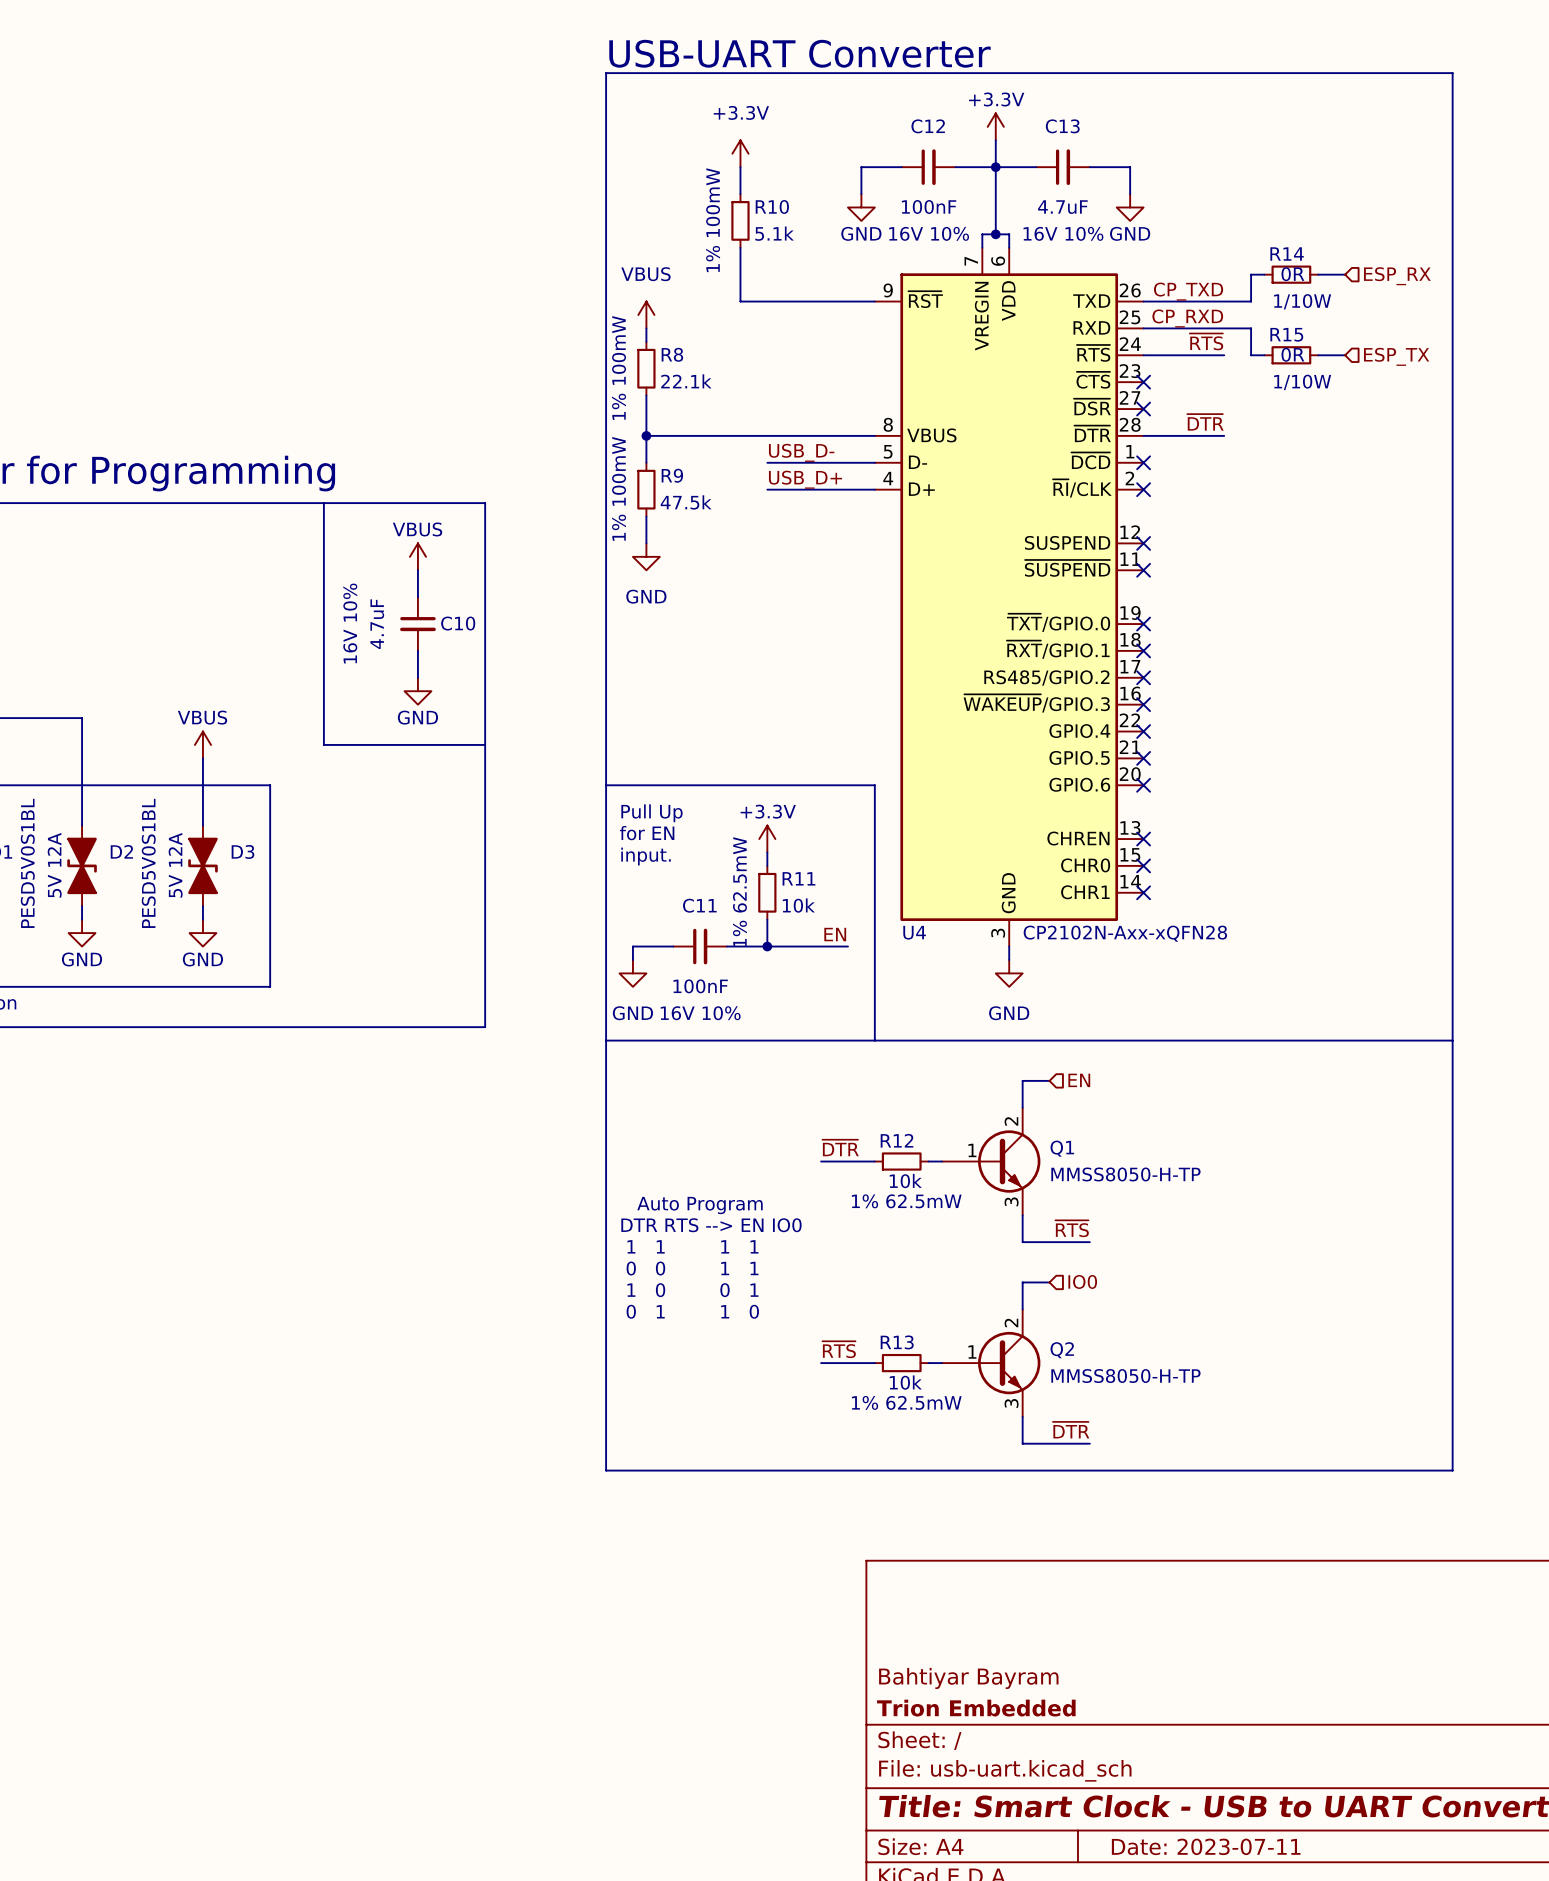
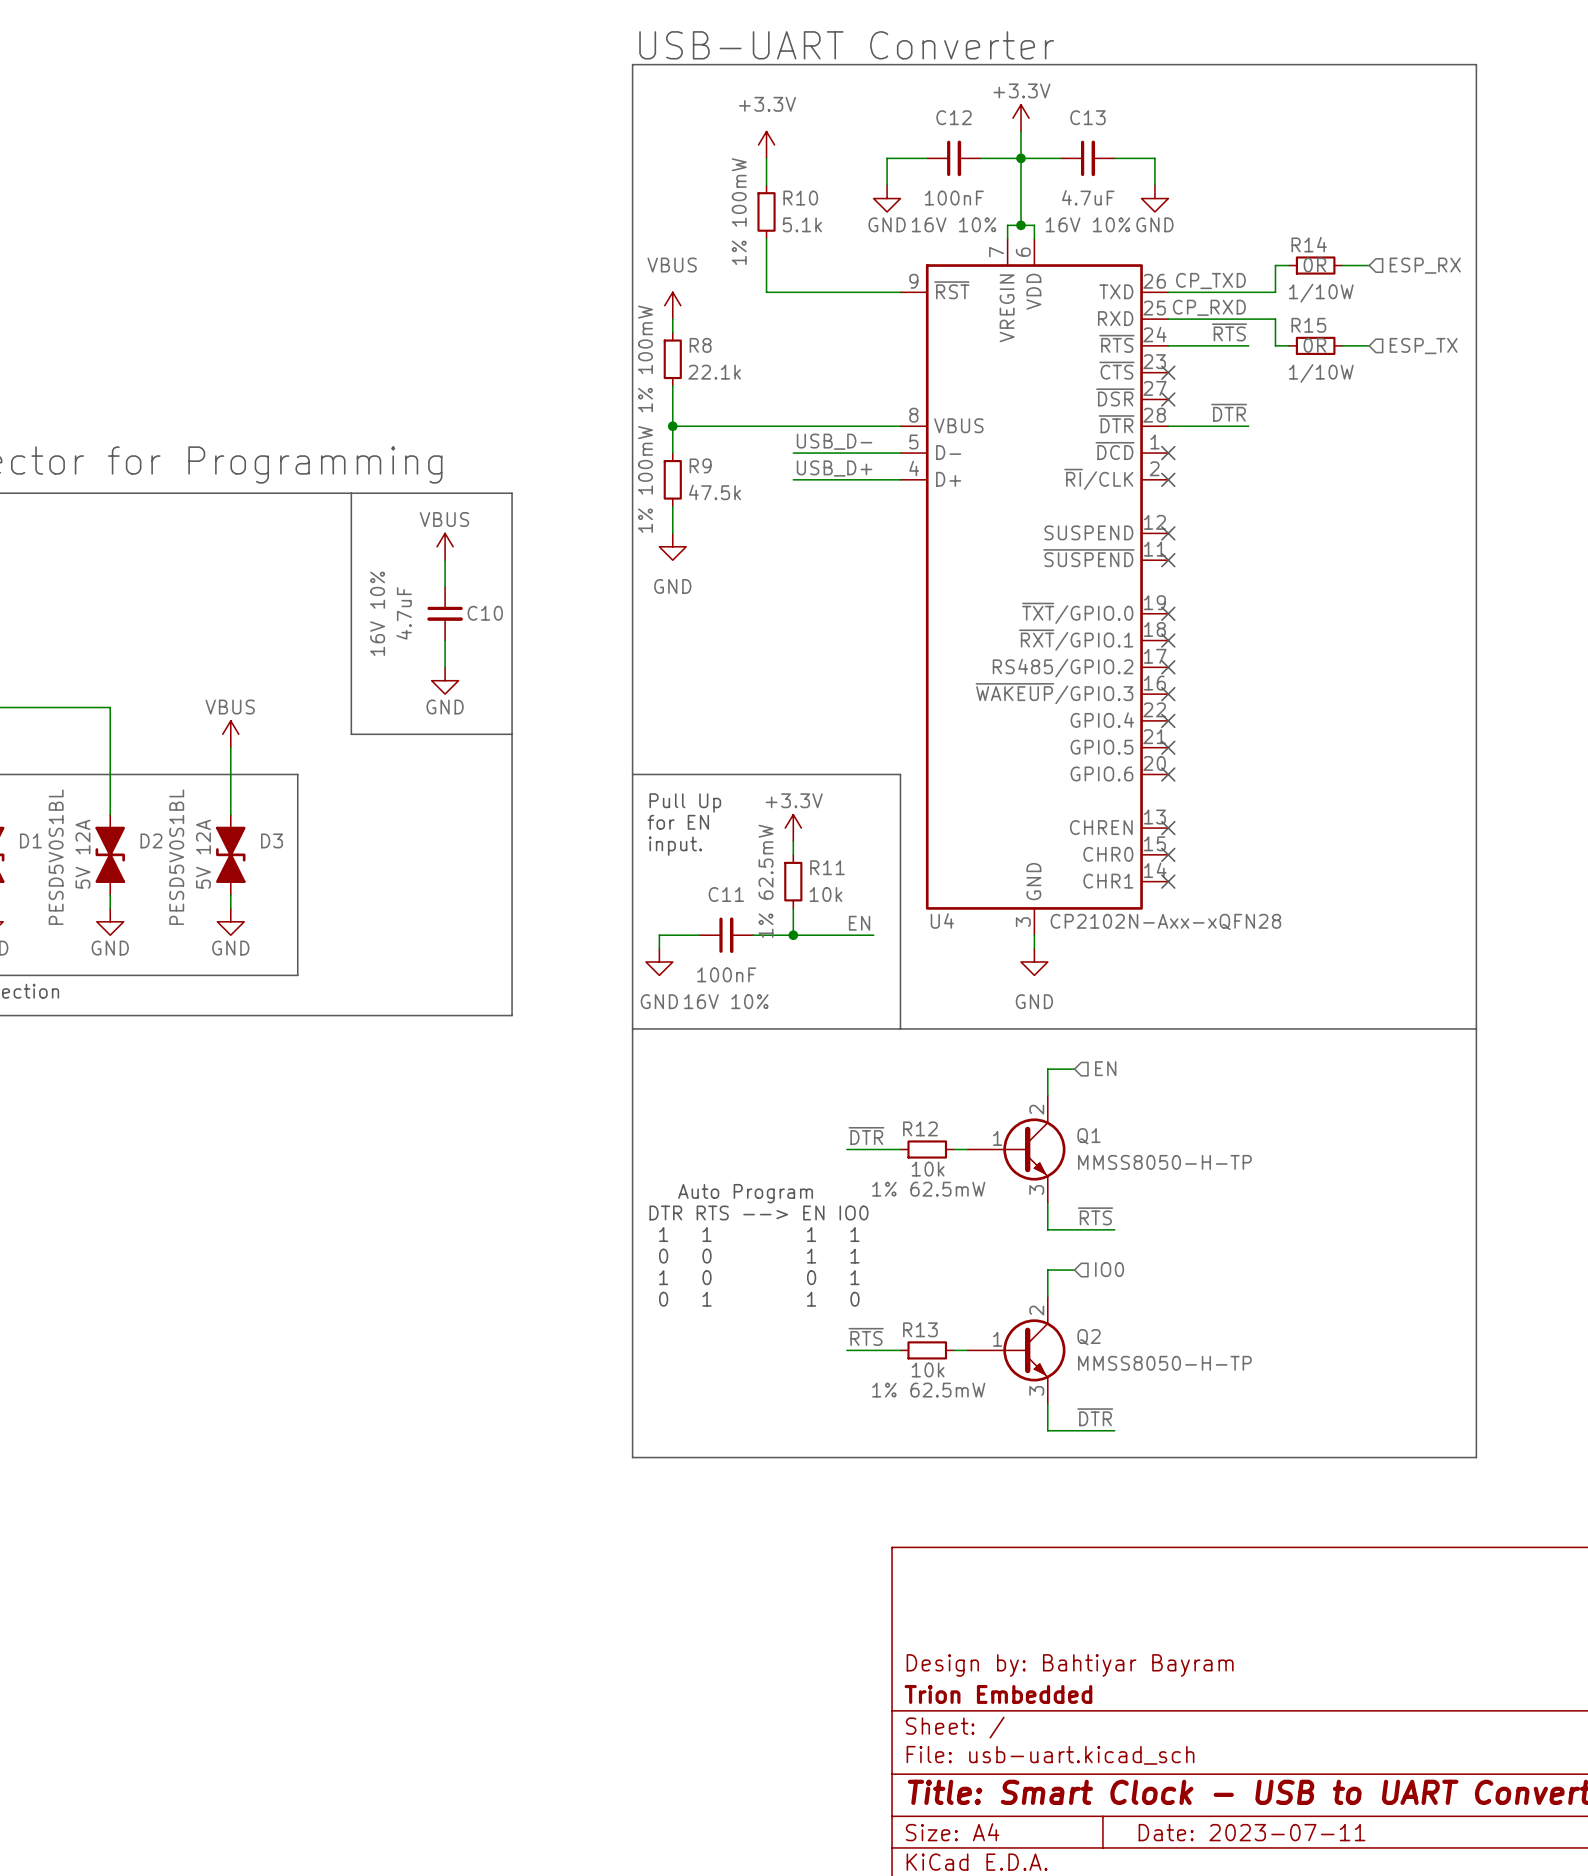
title block: Bahtiyar Bayram (968, 1678) -> Design by: Bahtiyar Bayram (1070, 1665)

